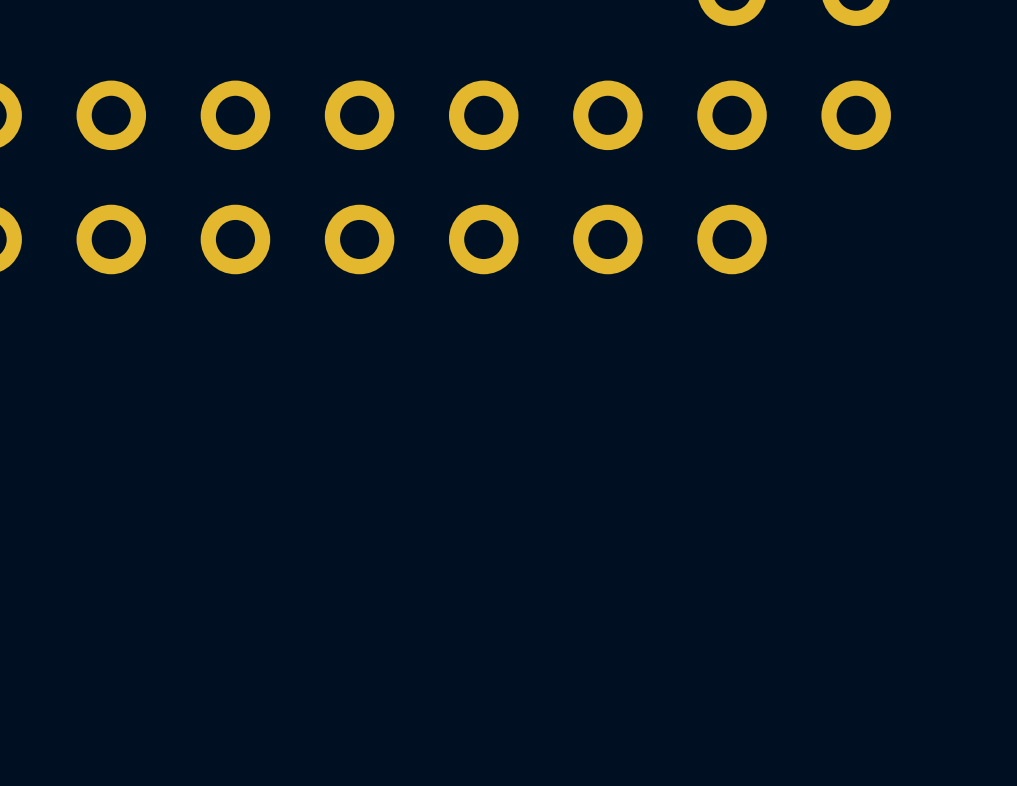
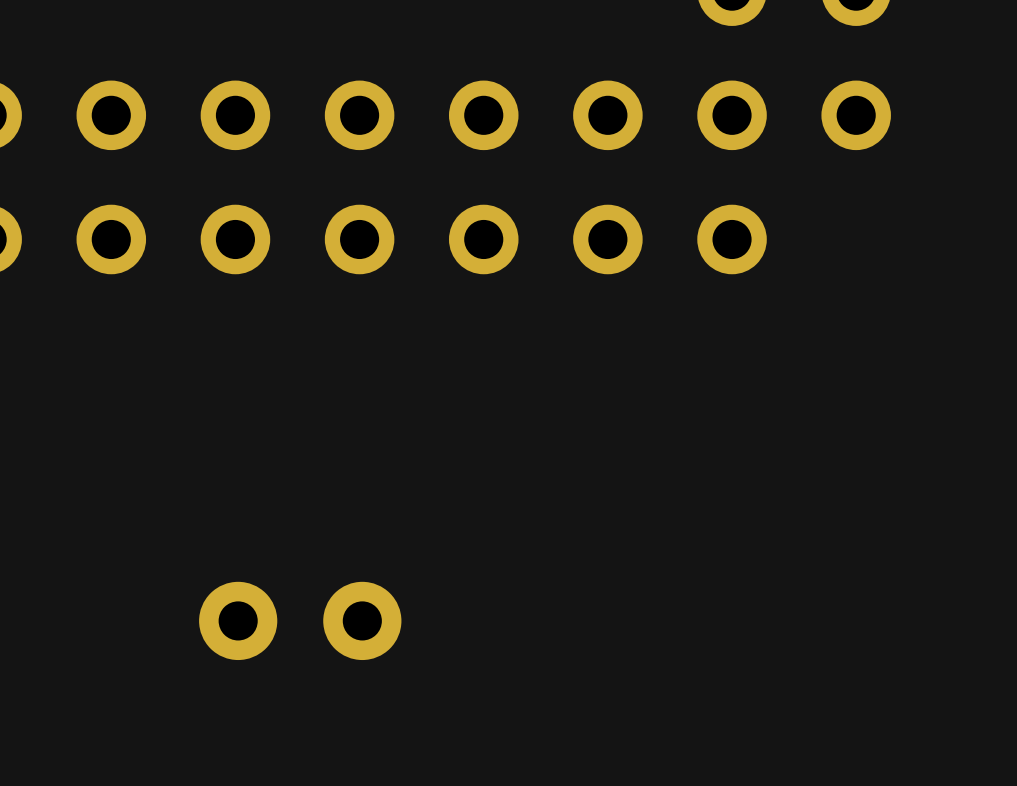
part: none -> (300, 620)

